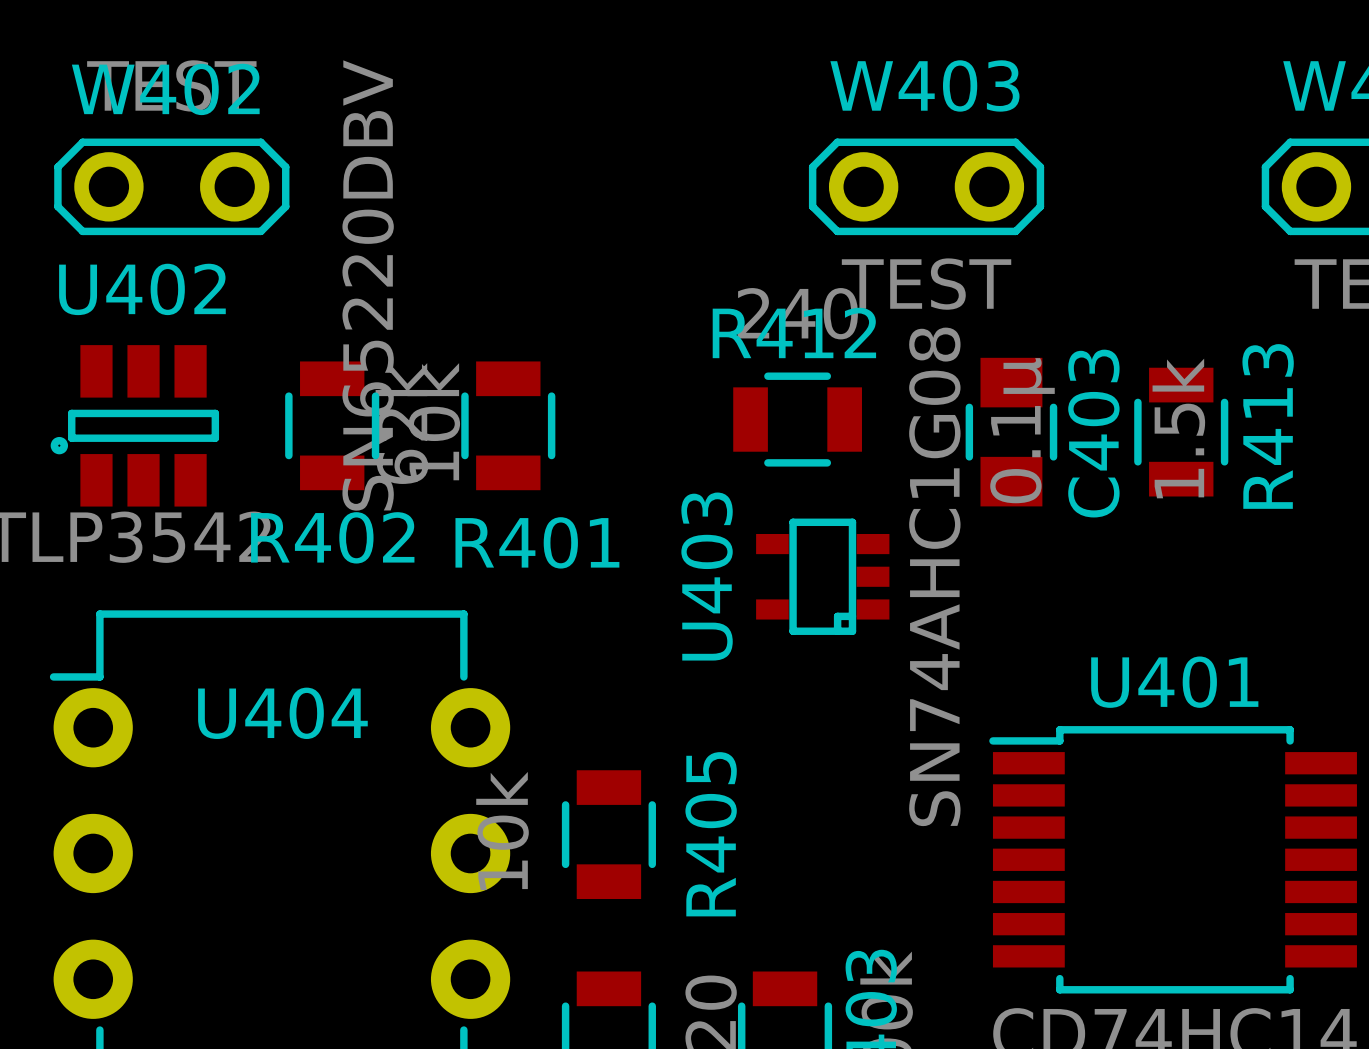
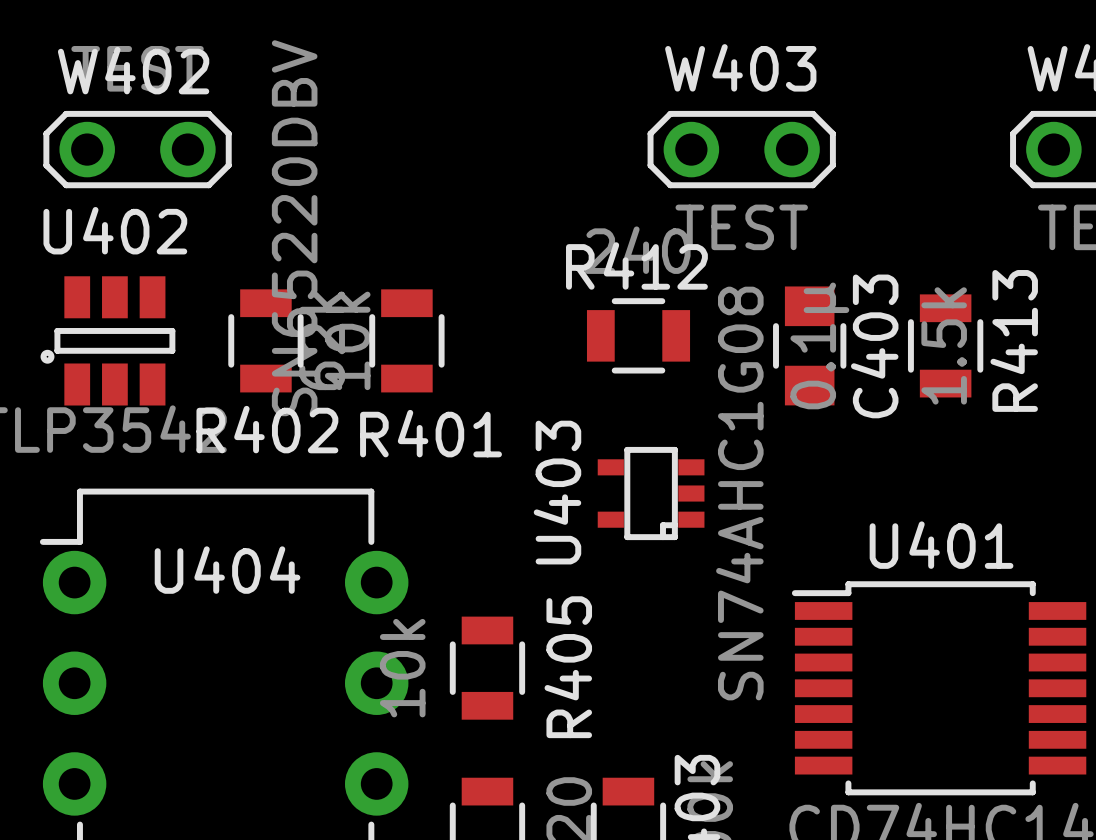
U403 position: (822, 576) -> (651, 493)

